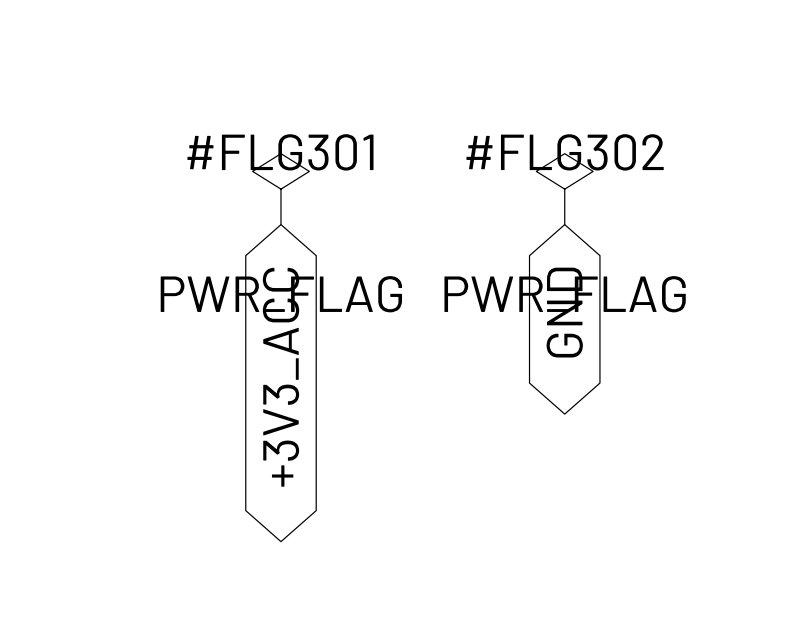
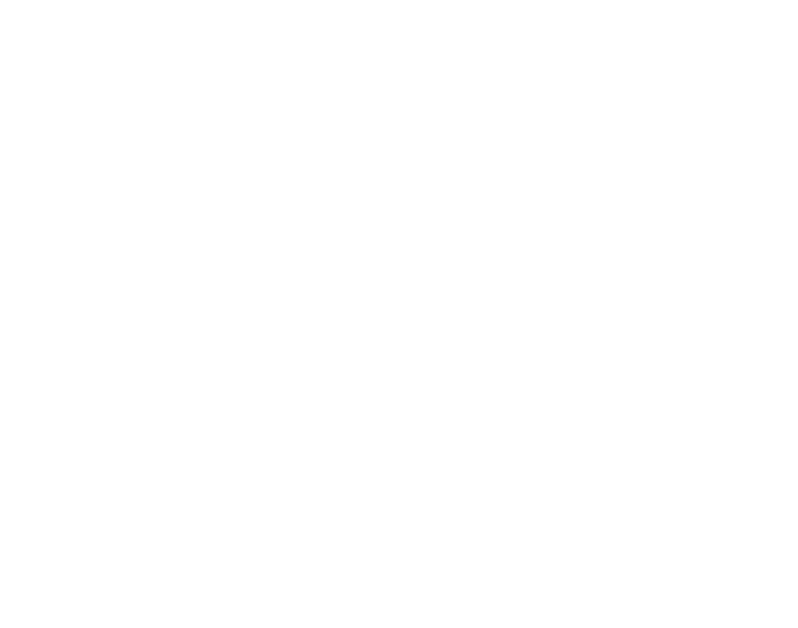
#FLG301: PWR_FLAG (280, 189) -> none
#FLG302: PWR_FLAG (564, 189) -> none
global label: GND (564, 312) -> none
global label: +3V3_ACC (281, 377) -> none

